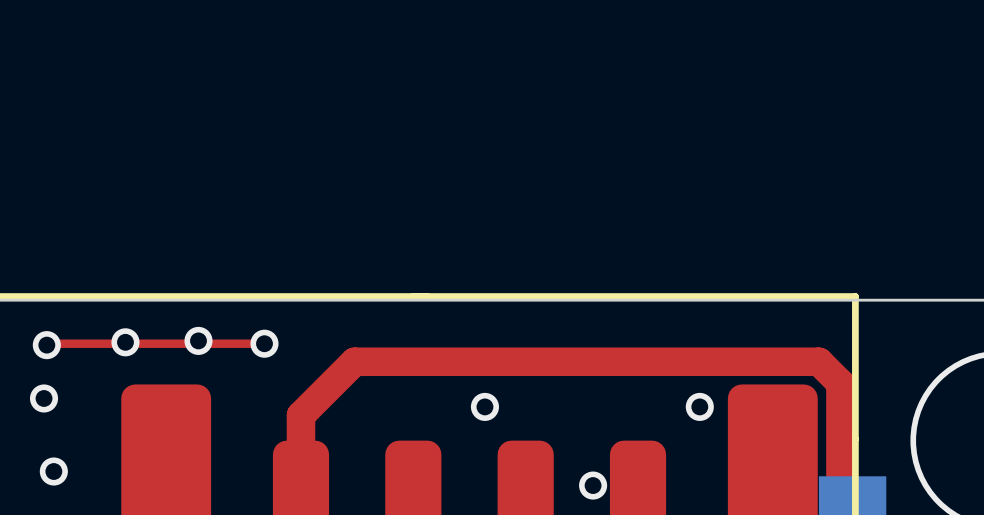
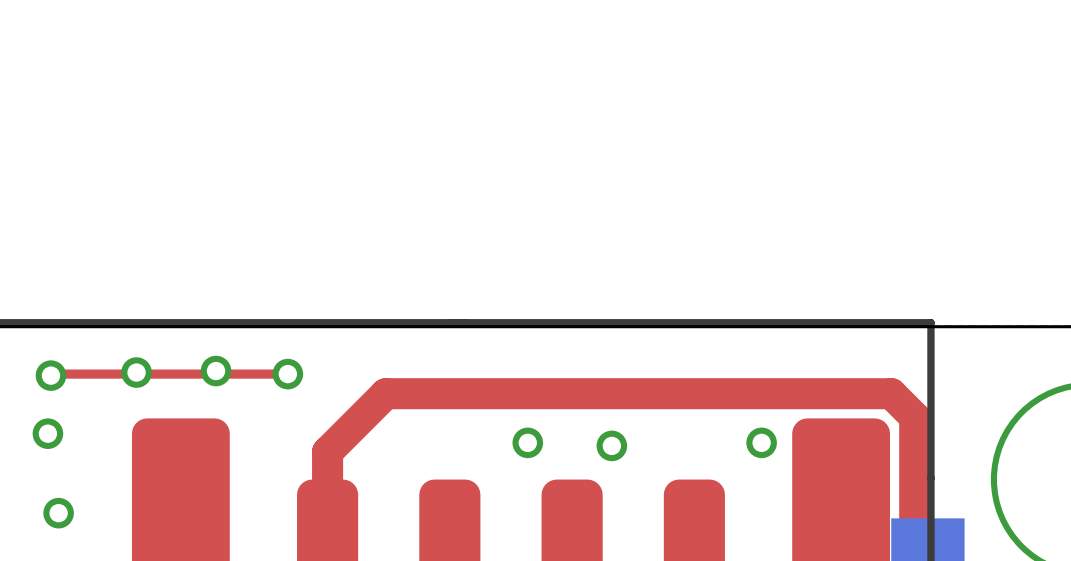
via position: (593, 485) -> (611, 445)

